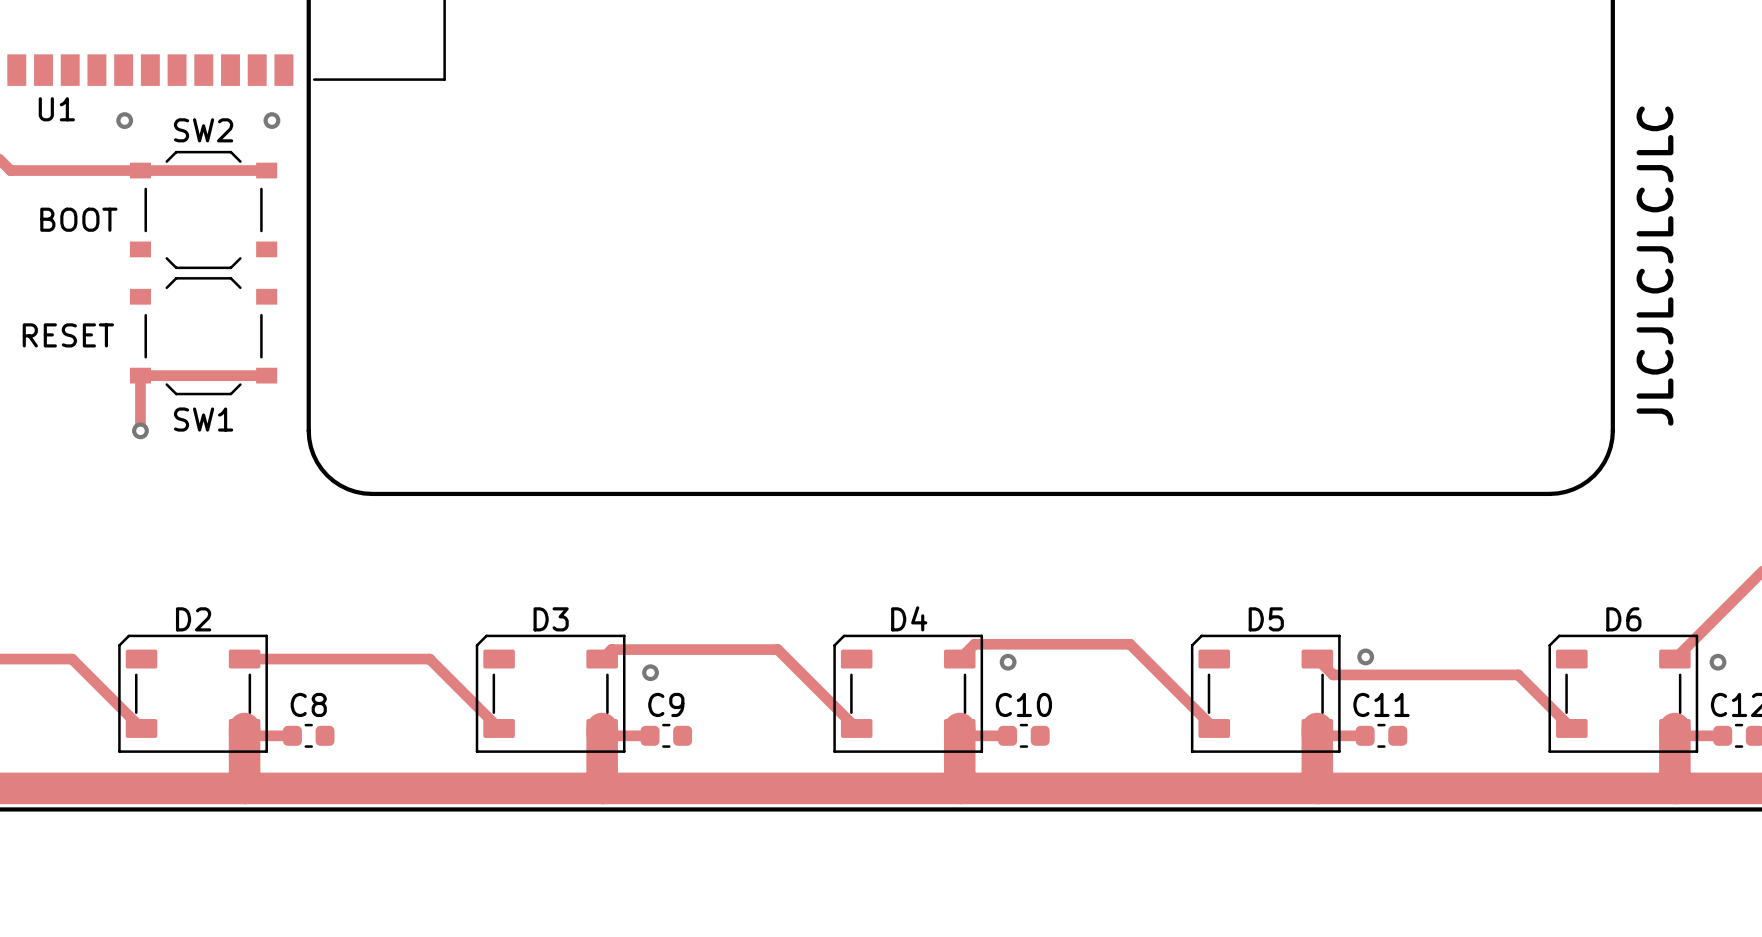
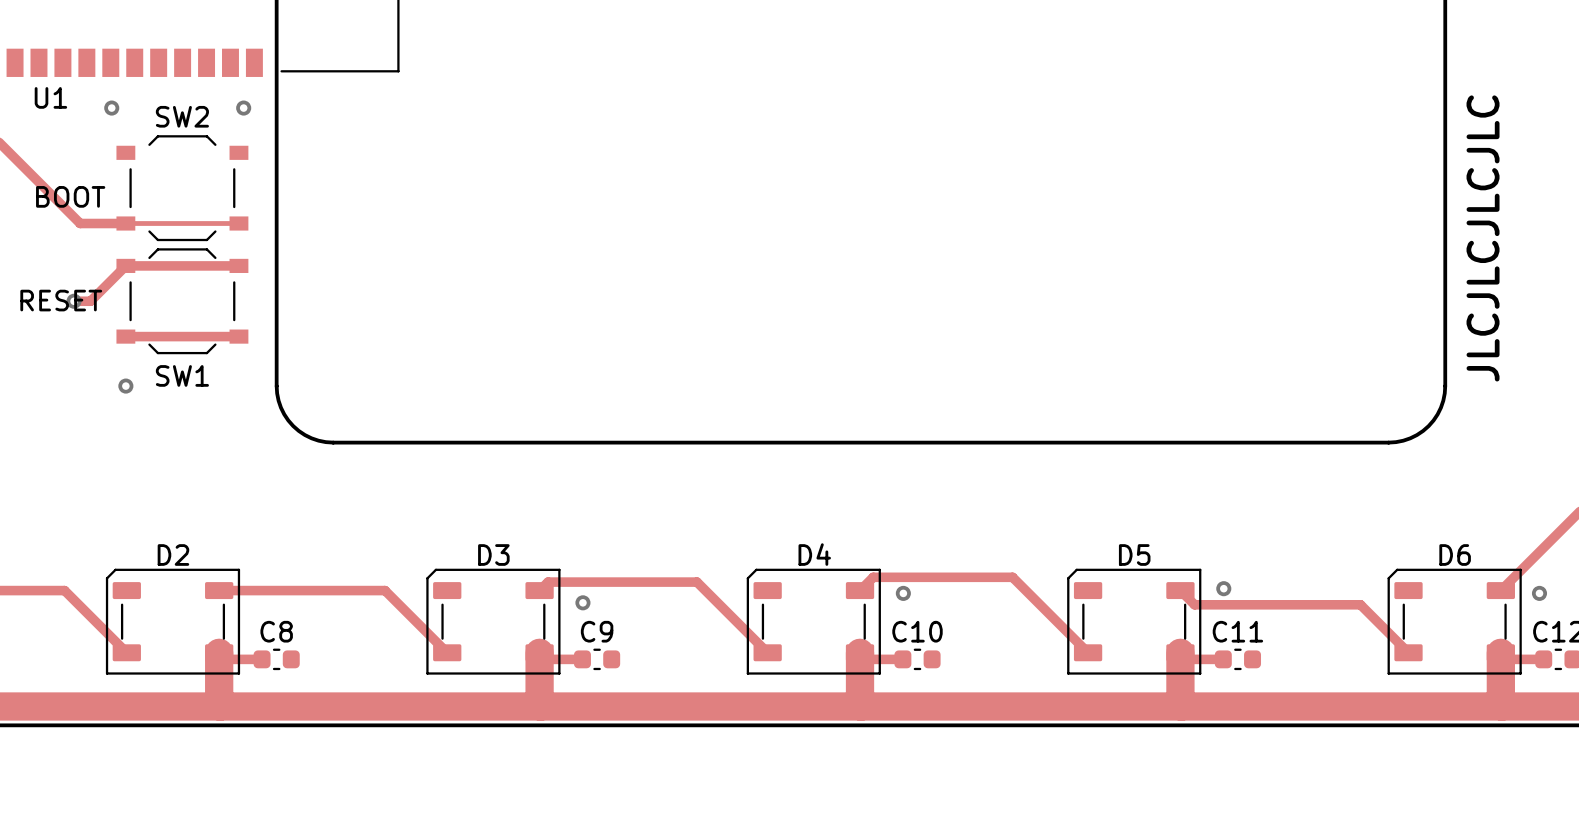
track: (10, 170) (266, 170) -> (9, 152) (80, 223) (238, 223)
track: none -> (238, 265) (125, 265) (90, 301) (74, 301)
via: none -> (74, 301)
track: (140, 375) (140, 430) -> none

